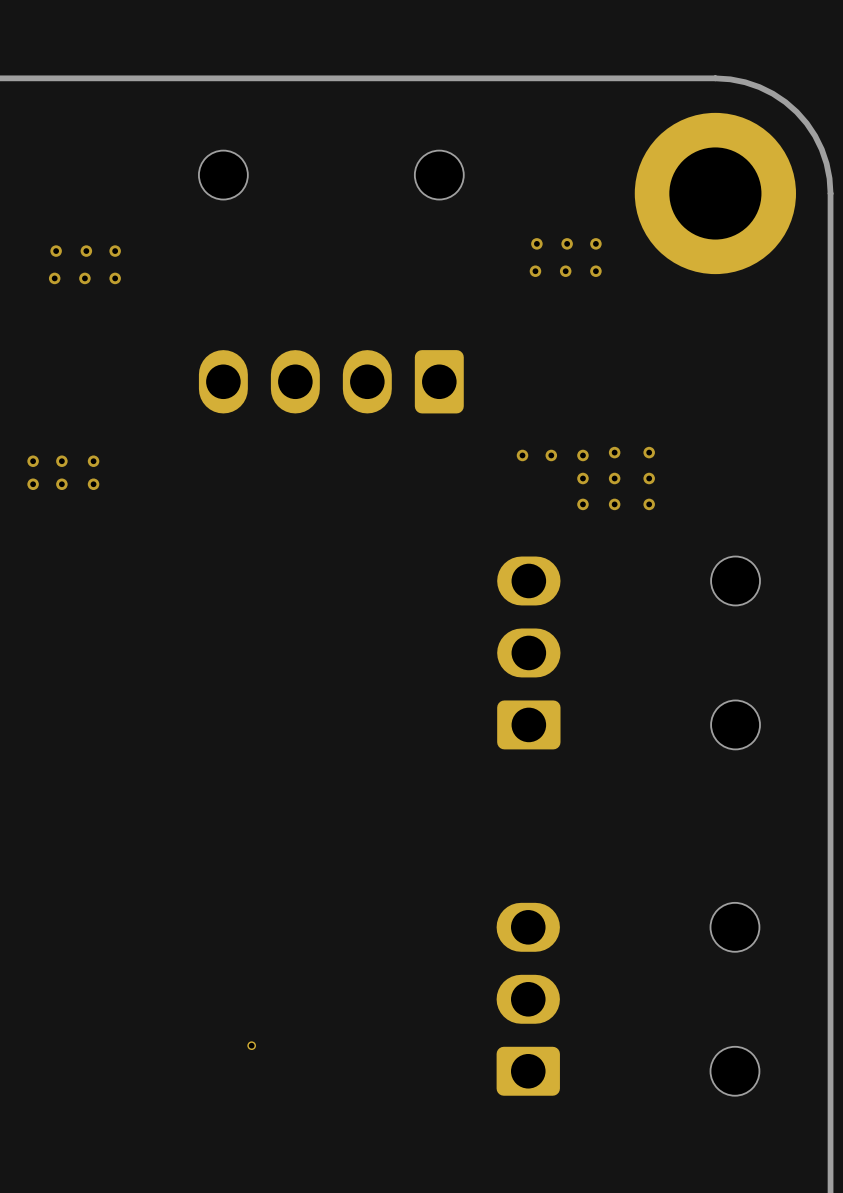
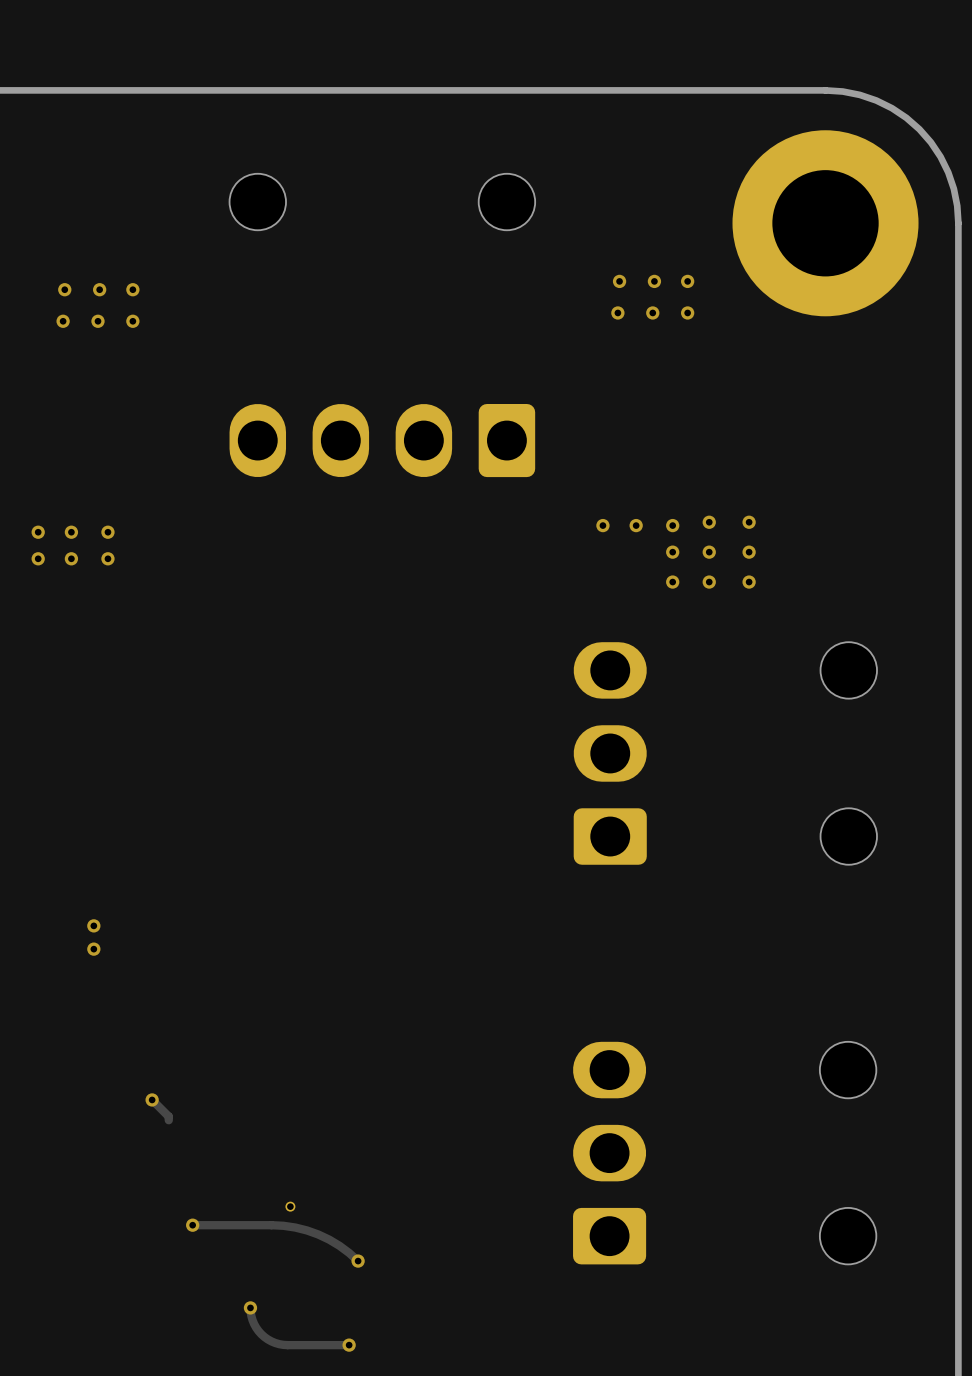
via: none -> (93, 925)
via: none -> (93, 949)
track: none -> (152, 1099) (168, 1116) (168, 1120)
via: none -> (152, 1099)
track: none -> (192, 1225) (271, 1225) (295, 1227) (329, 1239) (358, 1261)
via: none -> (192, 1225)
via: none -> (358, 1261)
track: none -> (250, 1307) (252, 1320) (258, 1331) (275, 1343) (287, 1345) (349, 1345)
via: none -> (250, 1307)
via: none -> (349, 1345)

